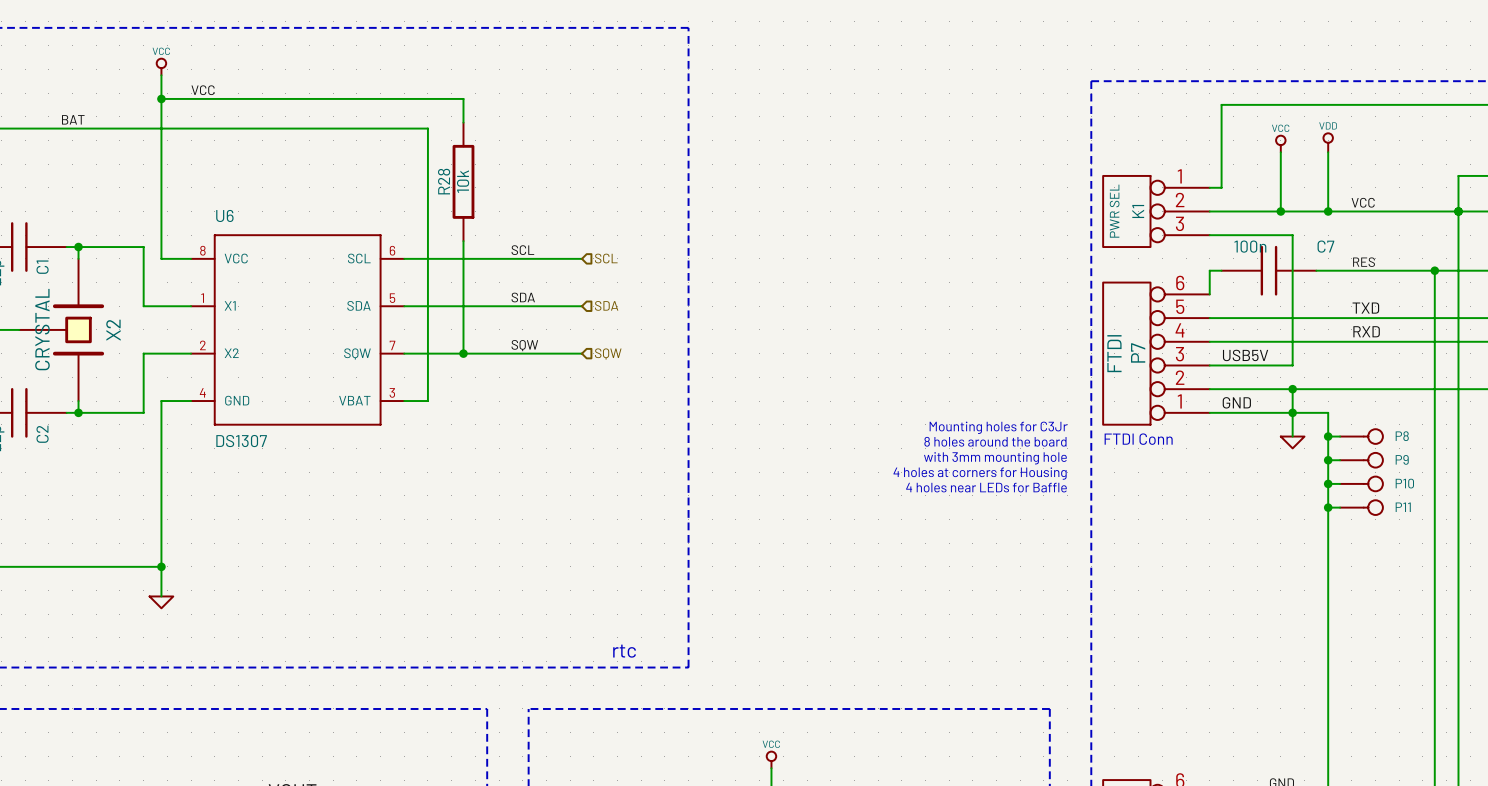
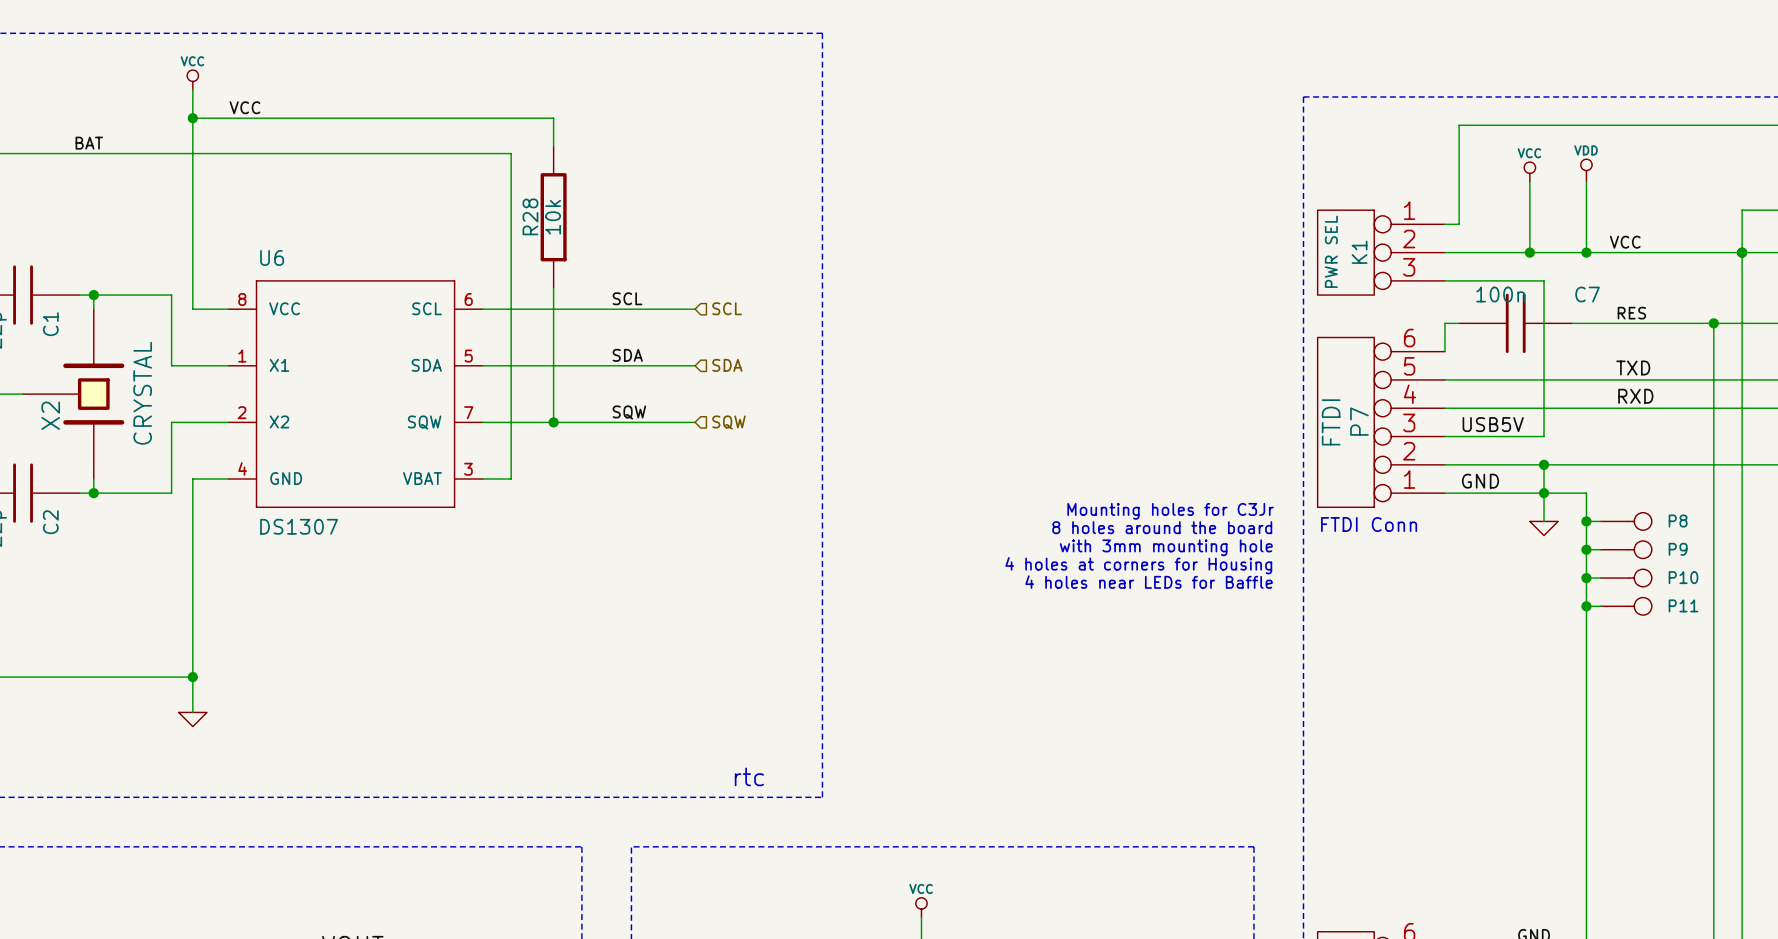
X2 value position: CRYSTAL (42, 329) -> CRYSTAL (142, 393)
X2 name position: X2 (113, 330) -> X2 (50, 415)

